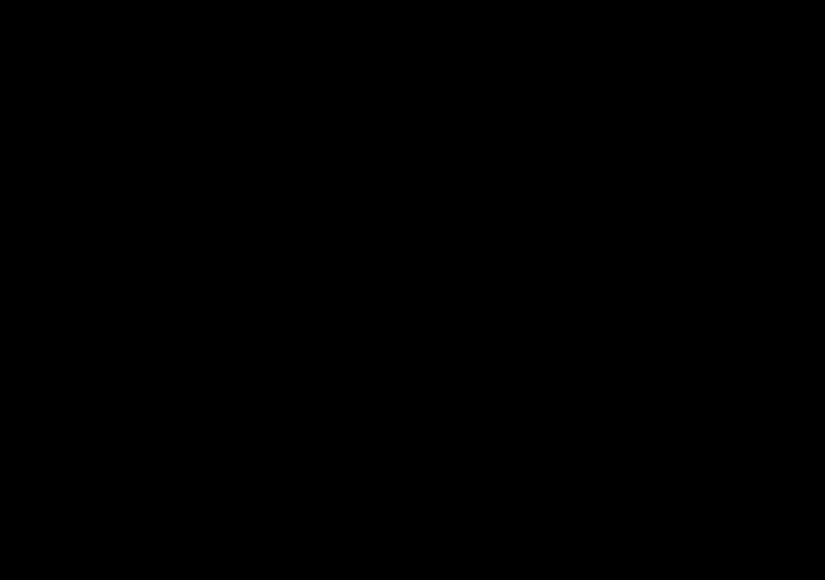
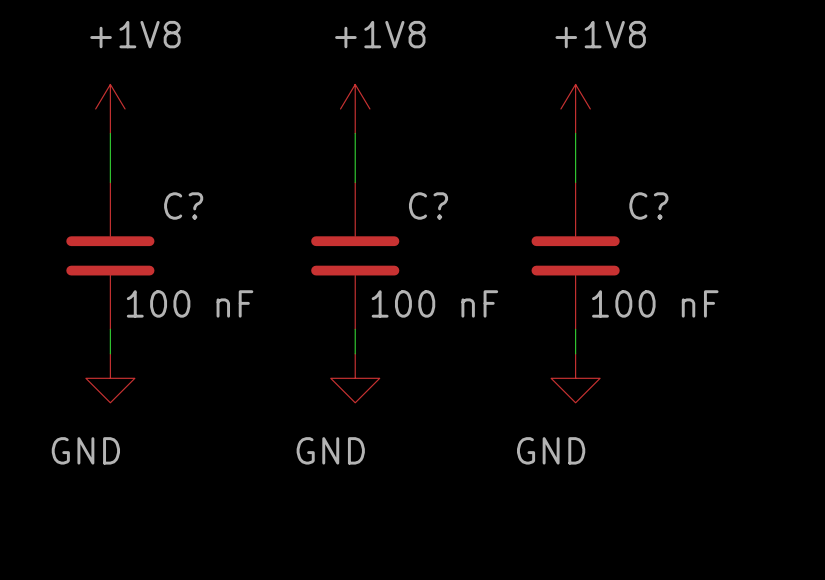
power symbol: none -> +1V8 (110, 108)
power symbol: none -> +1V8 (355, 108)
power symbol: none -> +1V8 (575, 108)
wire: none -> (110, 133) (110, 182)
wire: none -> (355, 133) (355, 182)
wire: none -> (575, 133) (575, 182)
C?: none -> 100 nF (110, 255)
C?: none -> 100 nF (355, 255)
C?: none -> 100 nF (575, 255)
wire: none -> (110, 329) (110, 353)
wire: none -> (355, 329) (355, 353)
wire: none -> (575, 329) (575, 353)
power symbol: none -> GND (110, 378)
power symbol: none -> GND (355, 378)
power symbol: none -> GND (575, 378)

